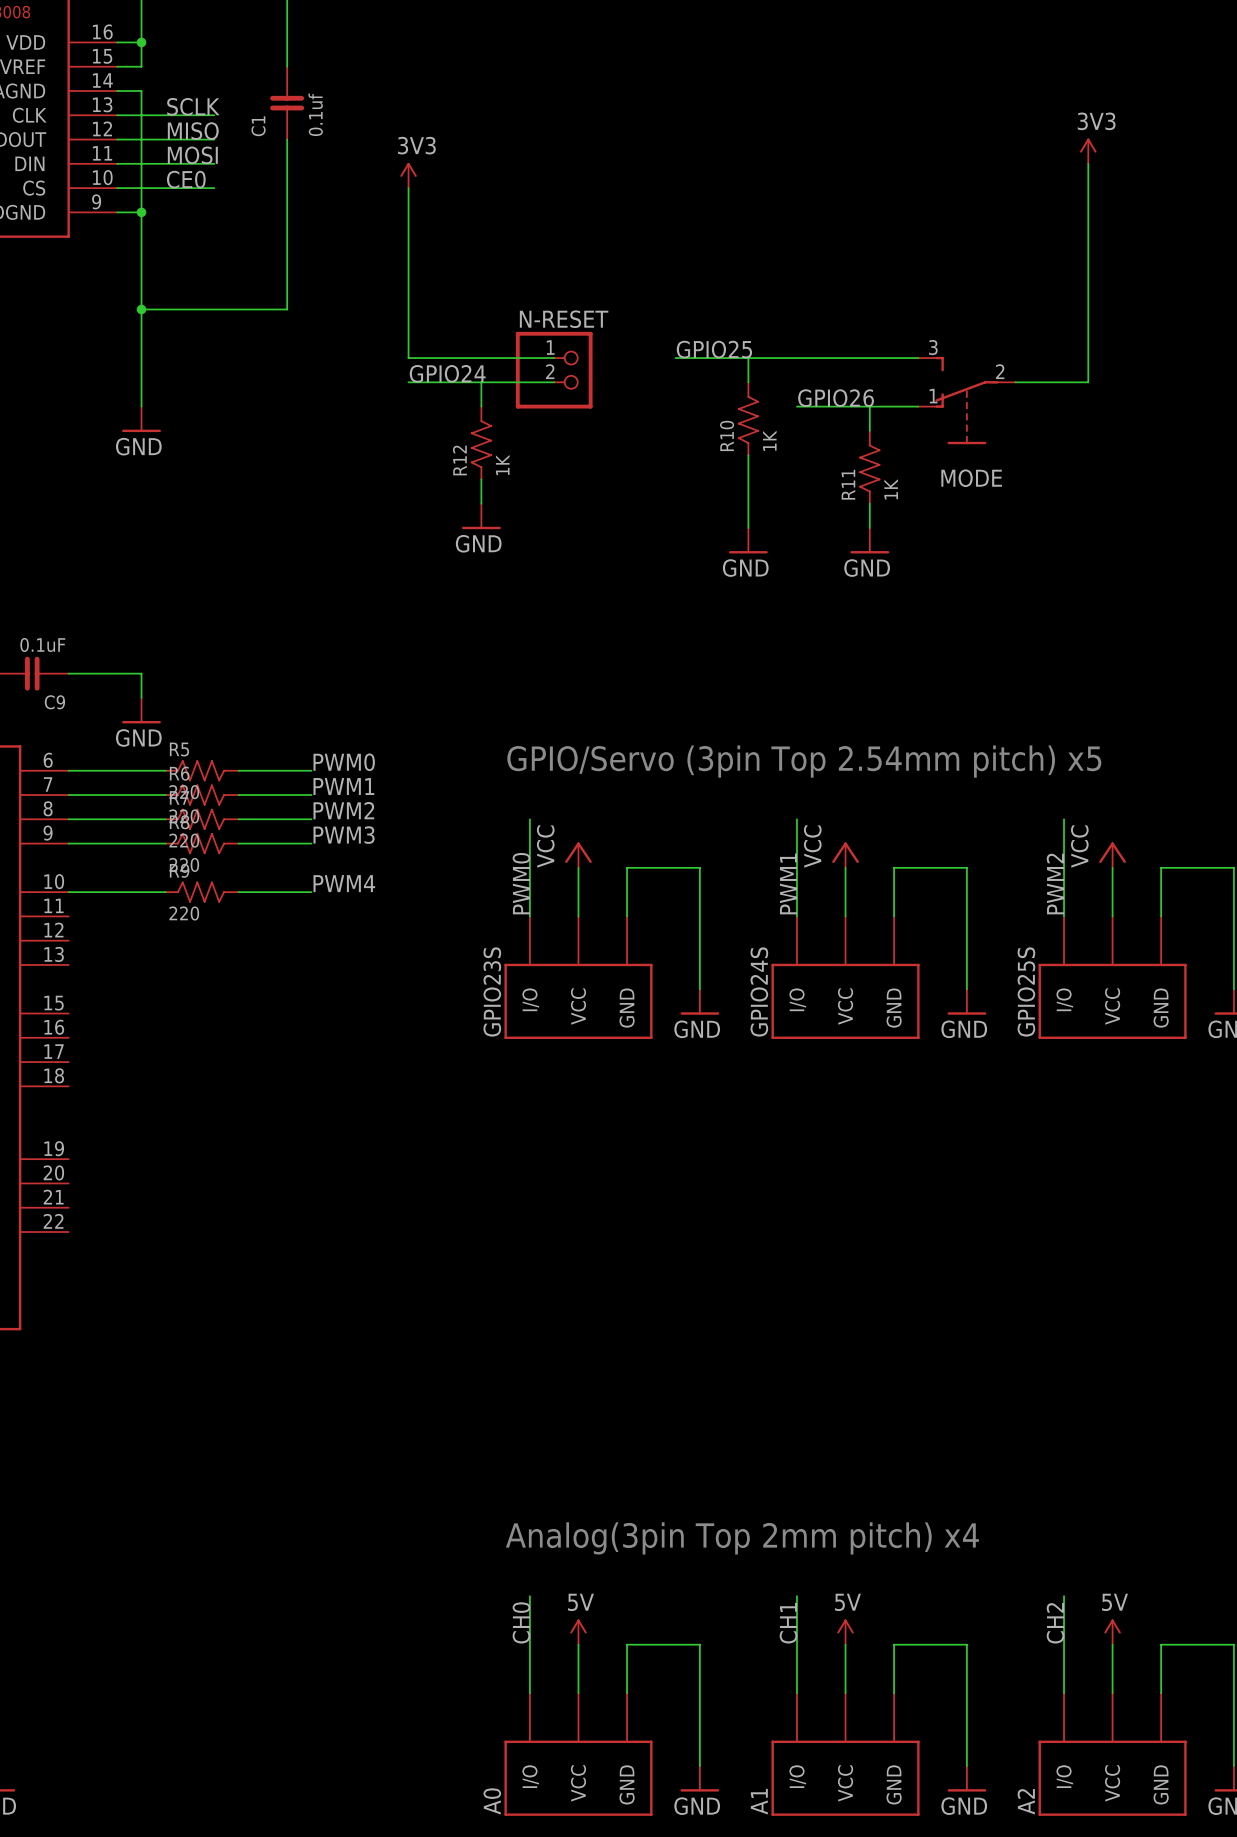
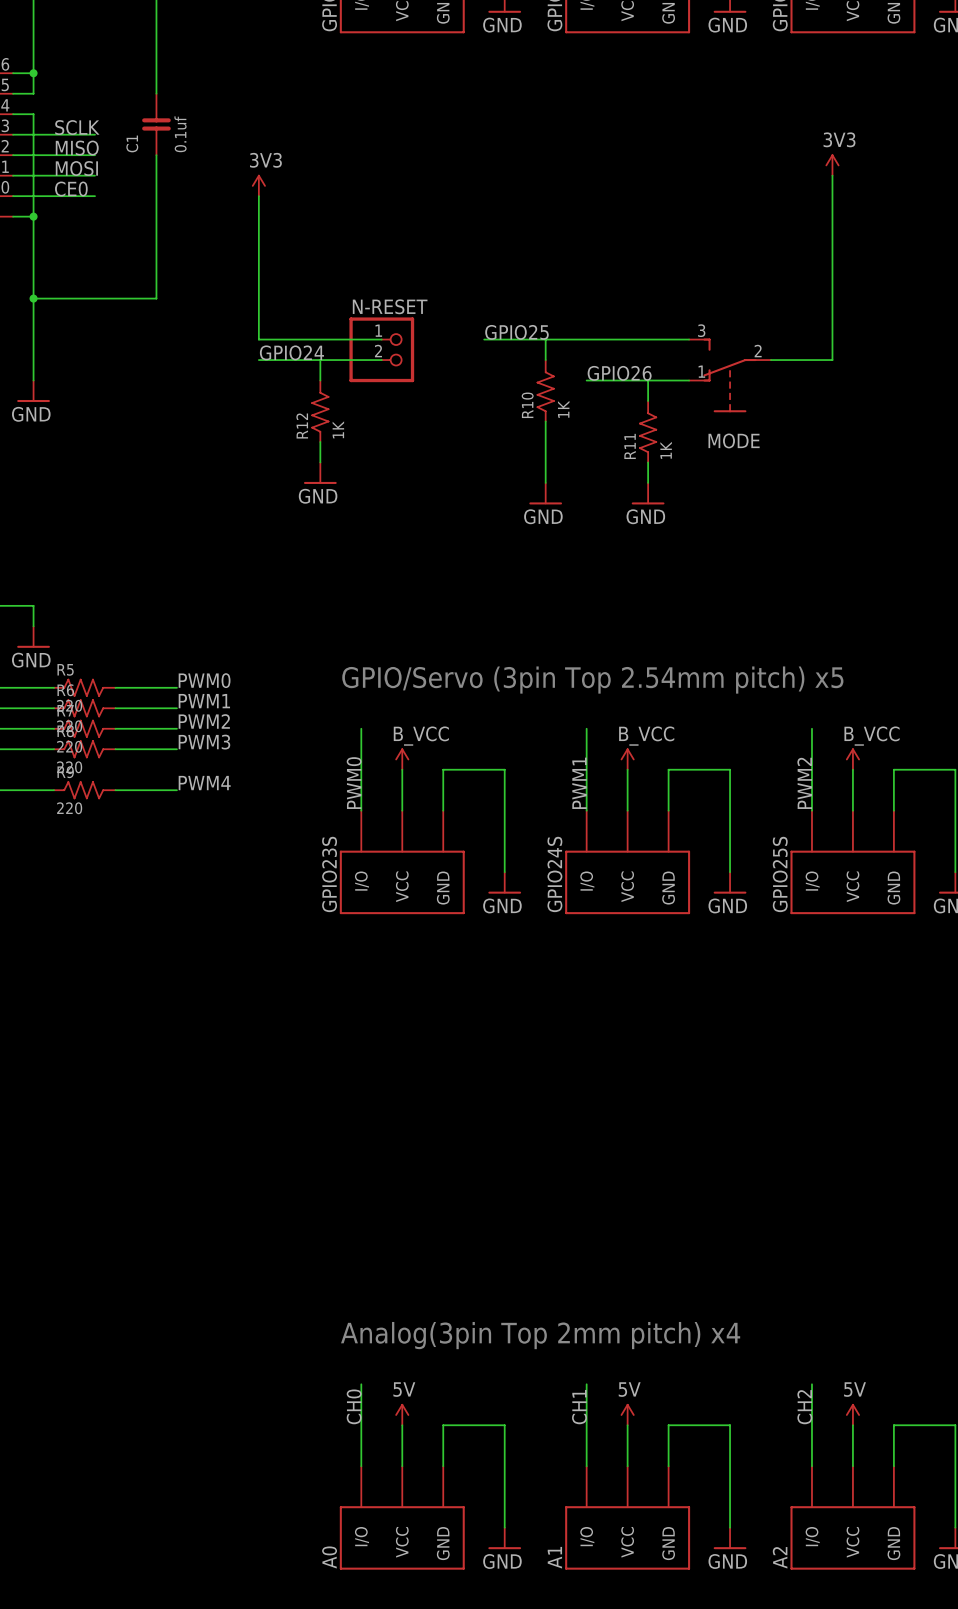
power symbol: VCC (578, 855) -> B_VCC (402, 759)
power symbol: VCC (845, 855) -> B_VCC (627, 759)
power symbol: VCC (1112, 855) -> B_VCC (852, 759)

